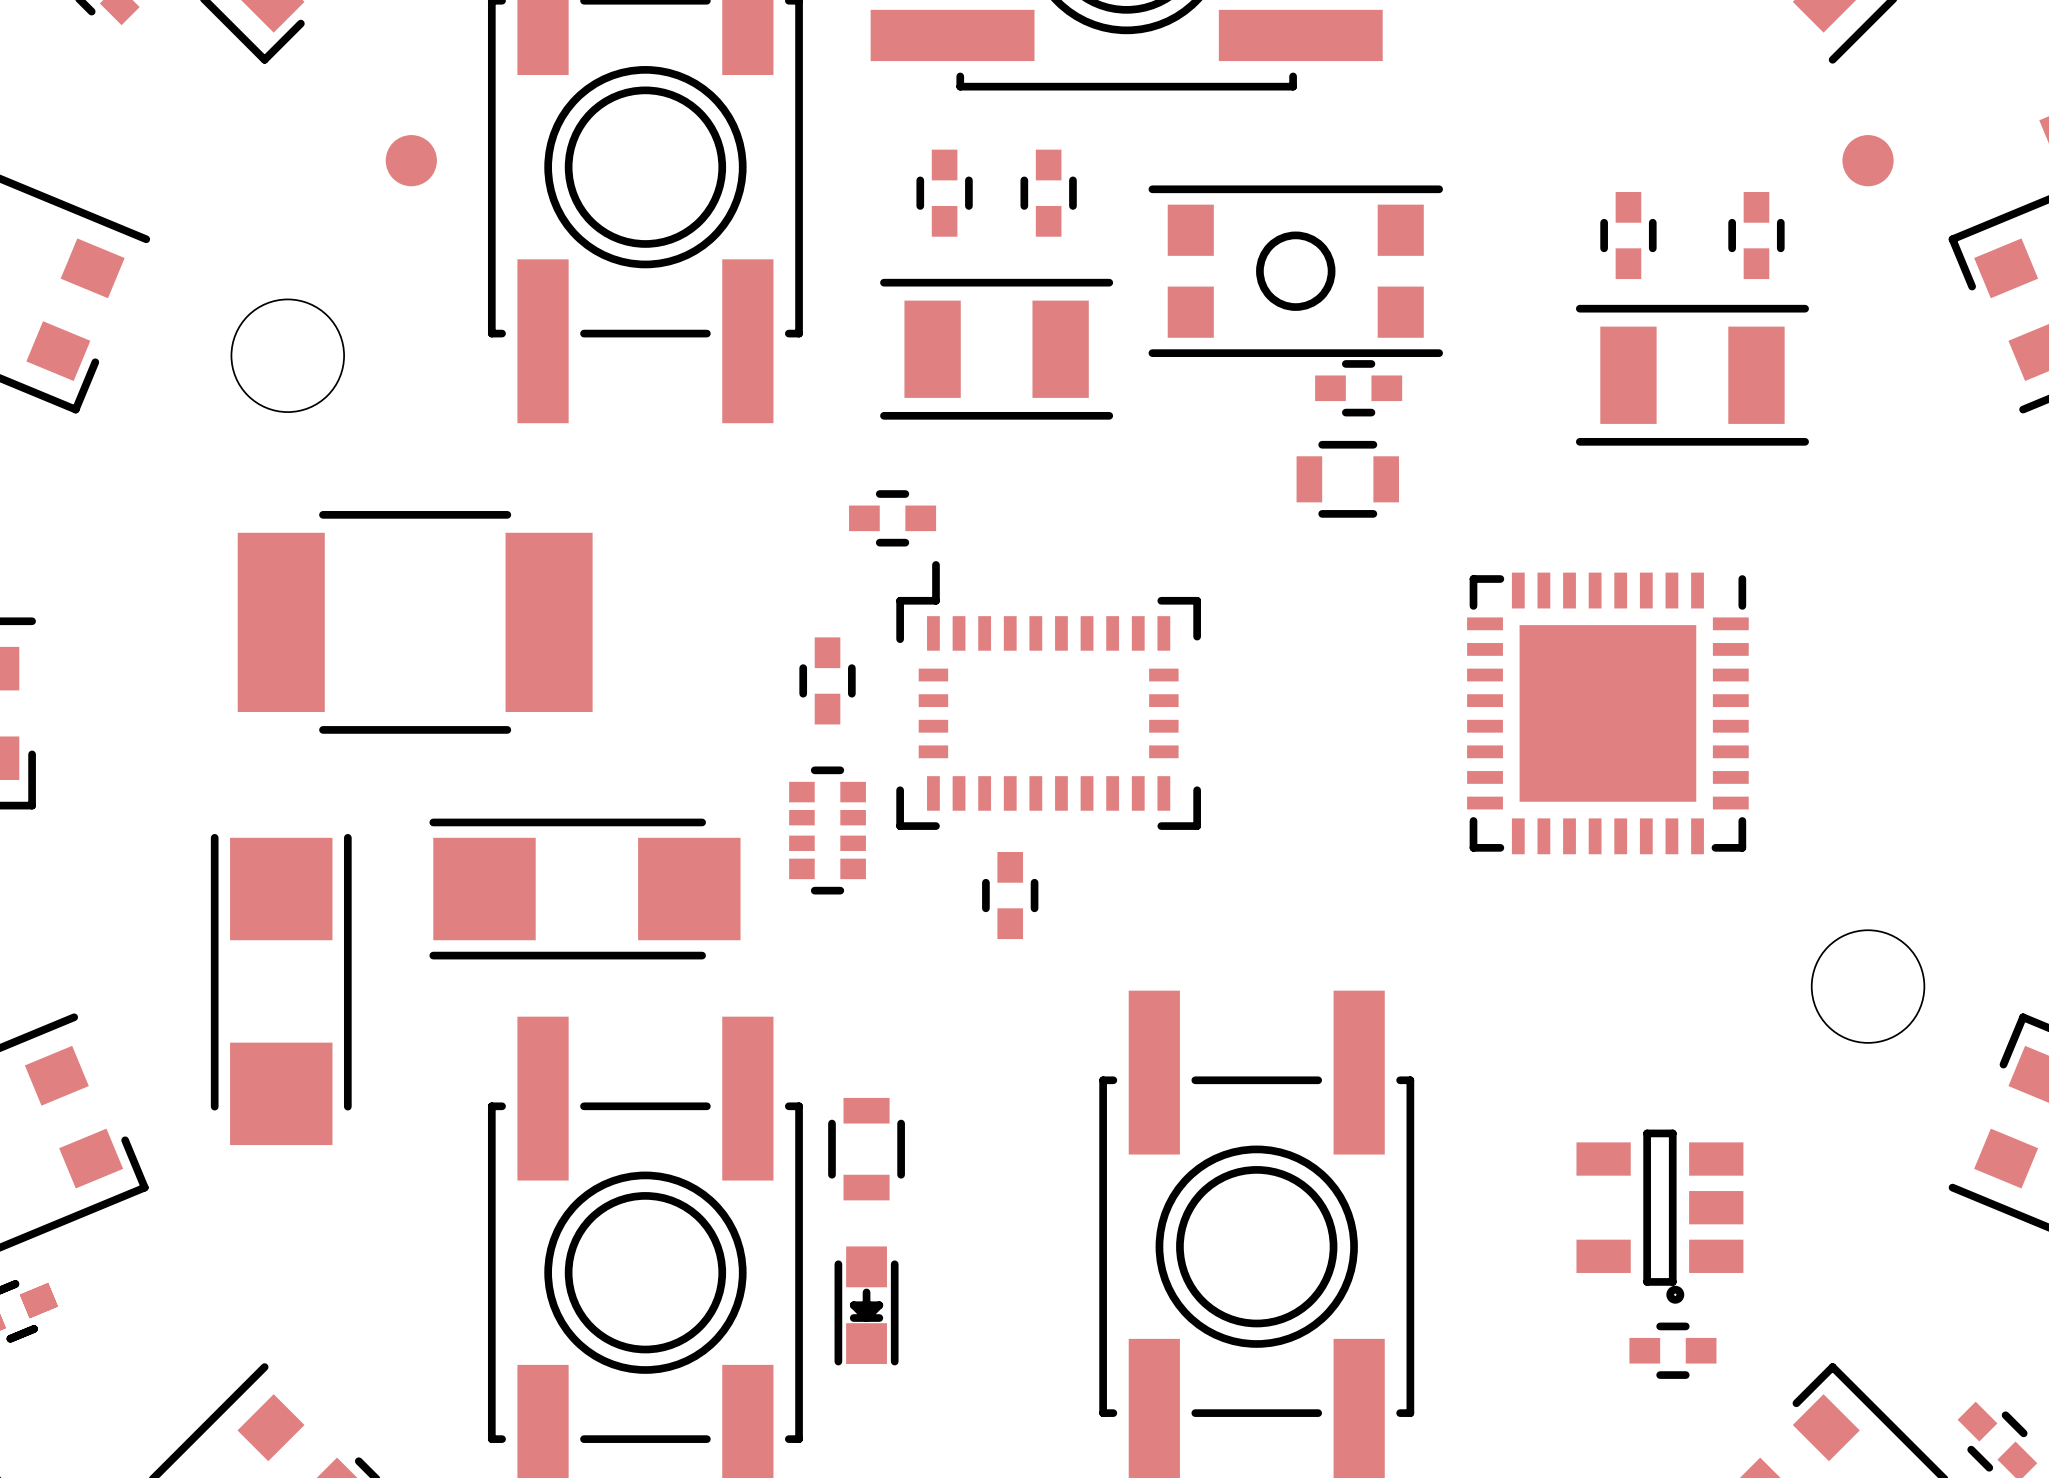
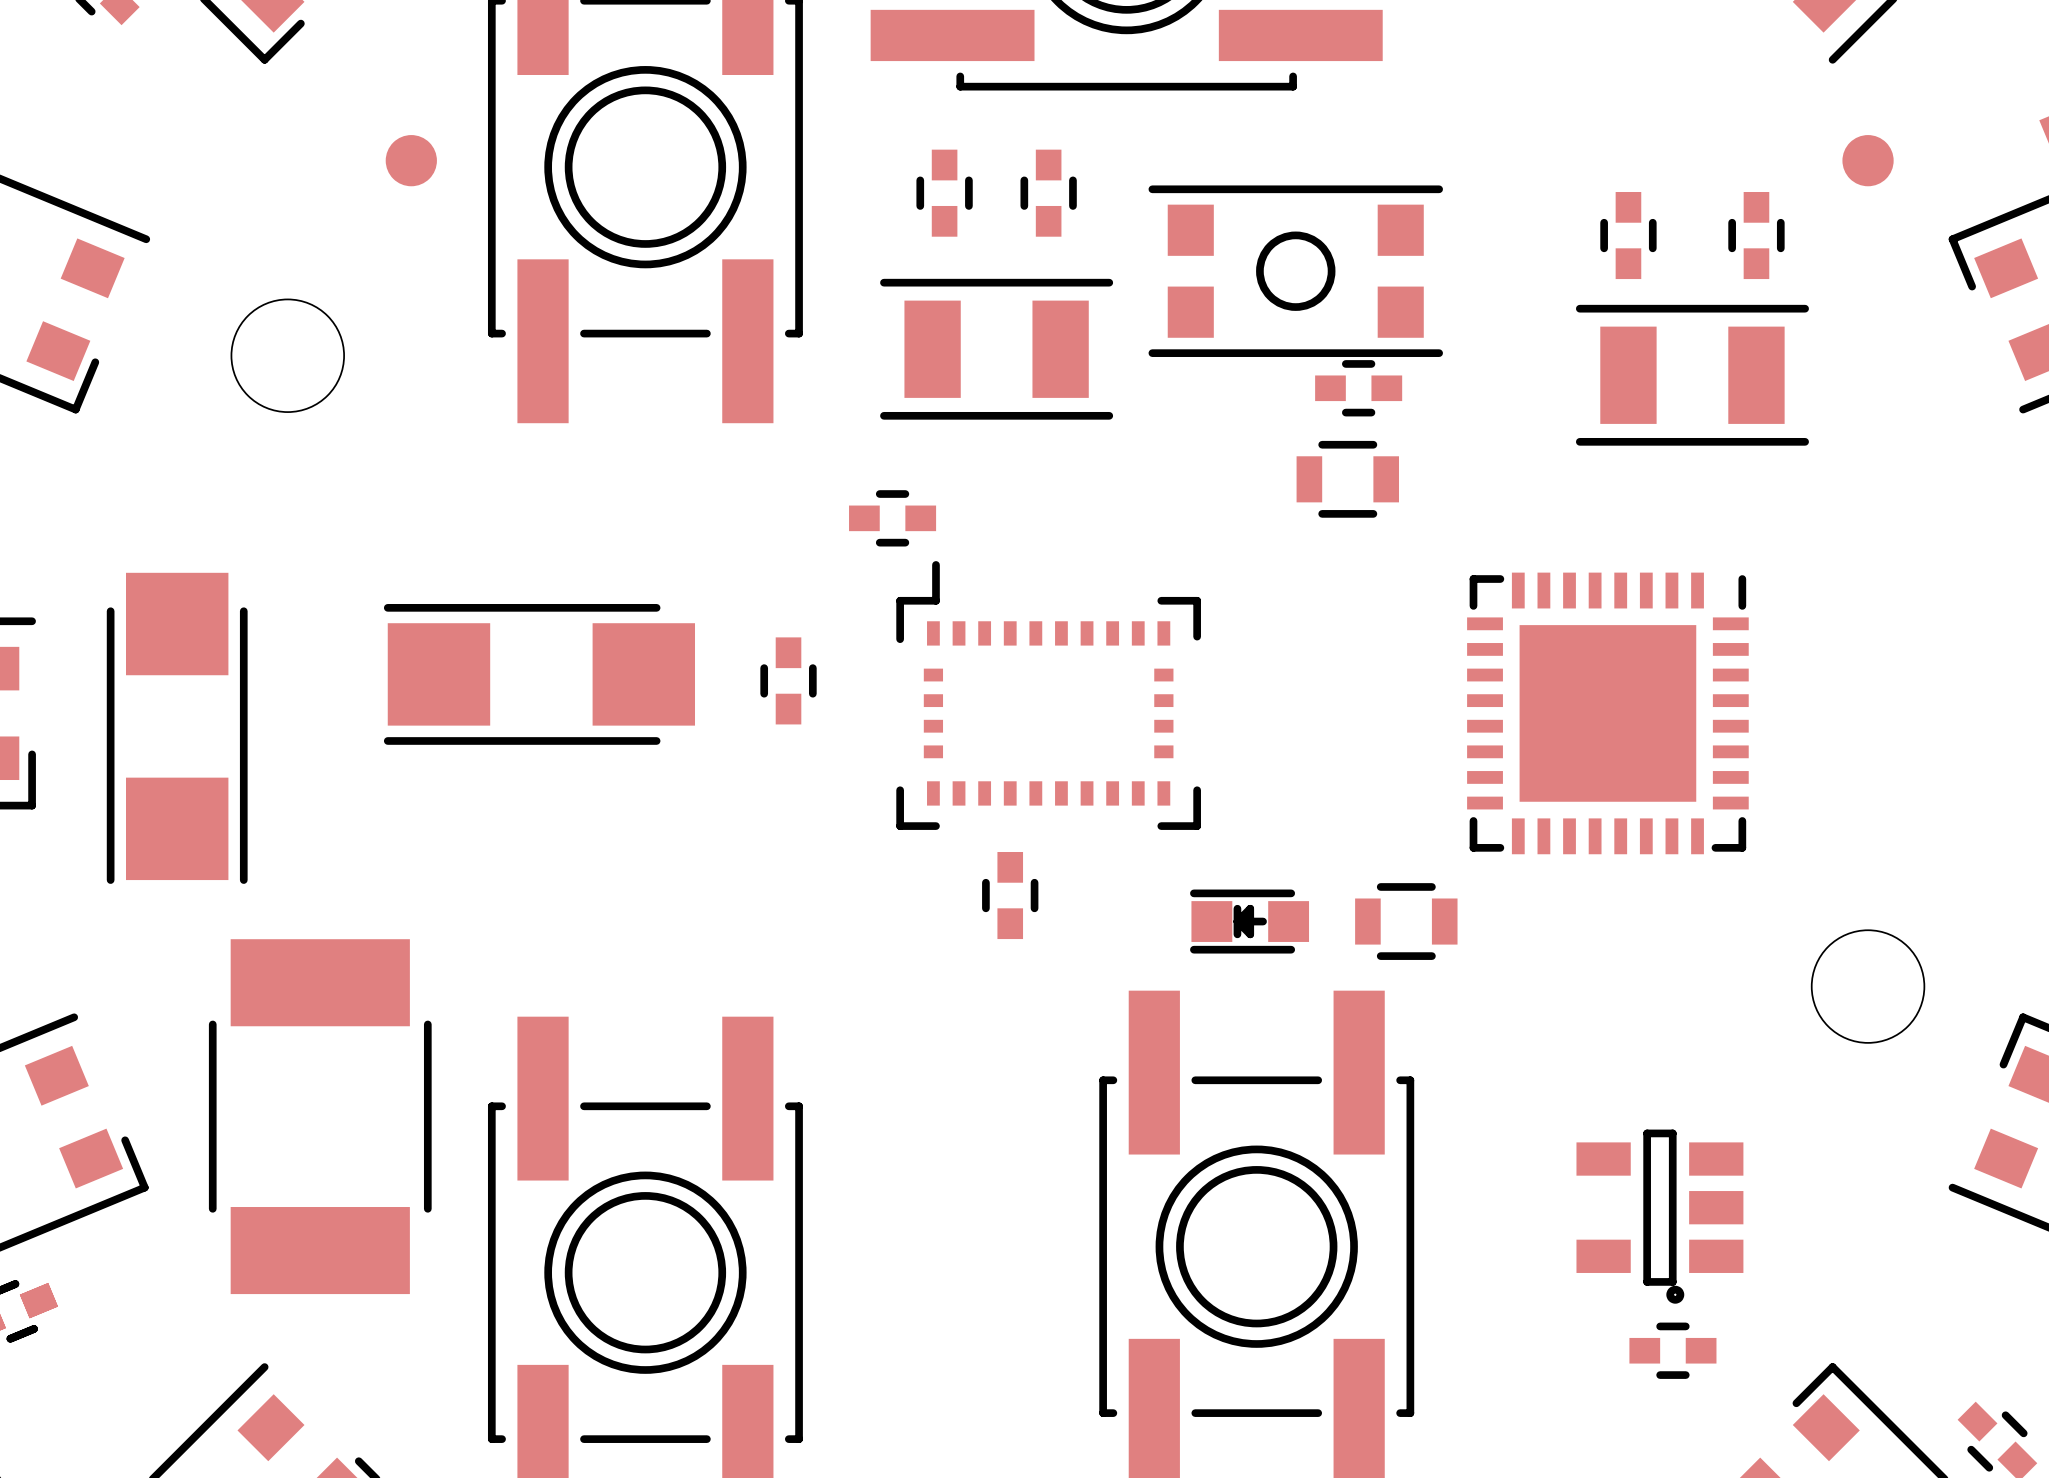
part footprint: [896, 561, 1201, 830] -> [896, 561, 1201, 830]
part rotation: 0° (415, 622) -> 90° clockwise (320, 1116)
part position: (415, 622) -> (320, 1116)
part: none -> (539, 674)
part position: (827, 680) -> (788, 680)
part: none -> (177, 728)
part: (827, 830) -> none
part: (584, 889) -> none
part: (281, 989) -> none
part rotation: 0° (866, 1149) -> 90° clockwise (1406, 921)
part position: (866, 1149) -> (1406, 921)
part rotation: 0° (866, 1305) -> 90° clockwise (1249, 921)
part position: (866, 1305) -> (1249, 921)

